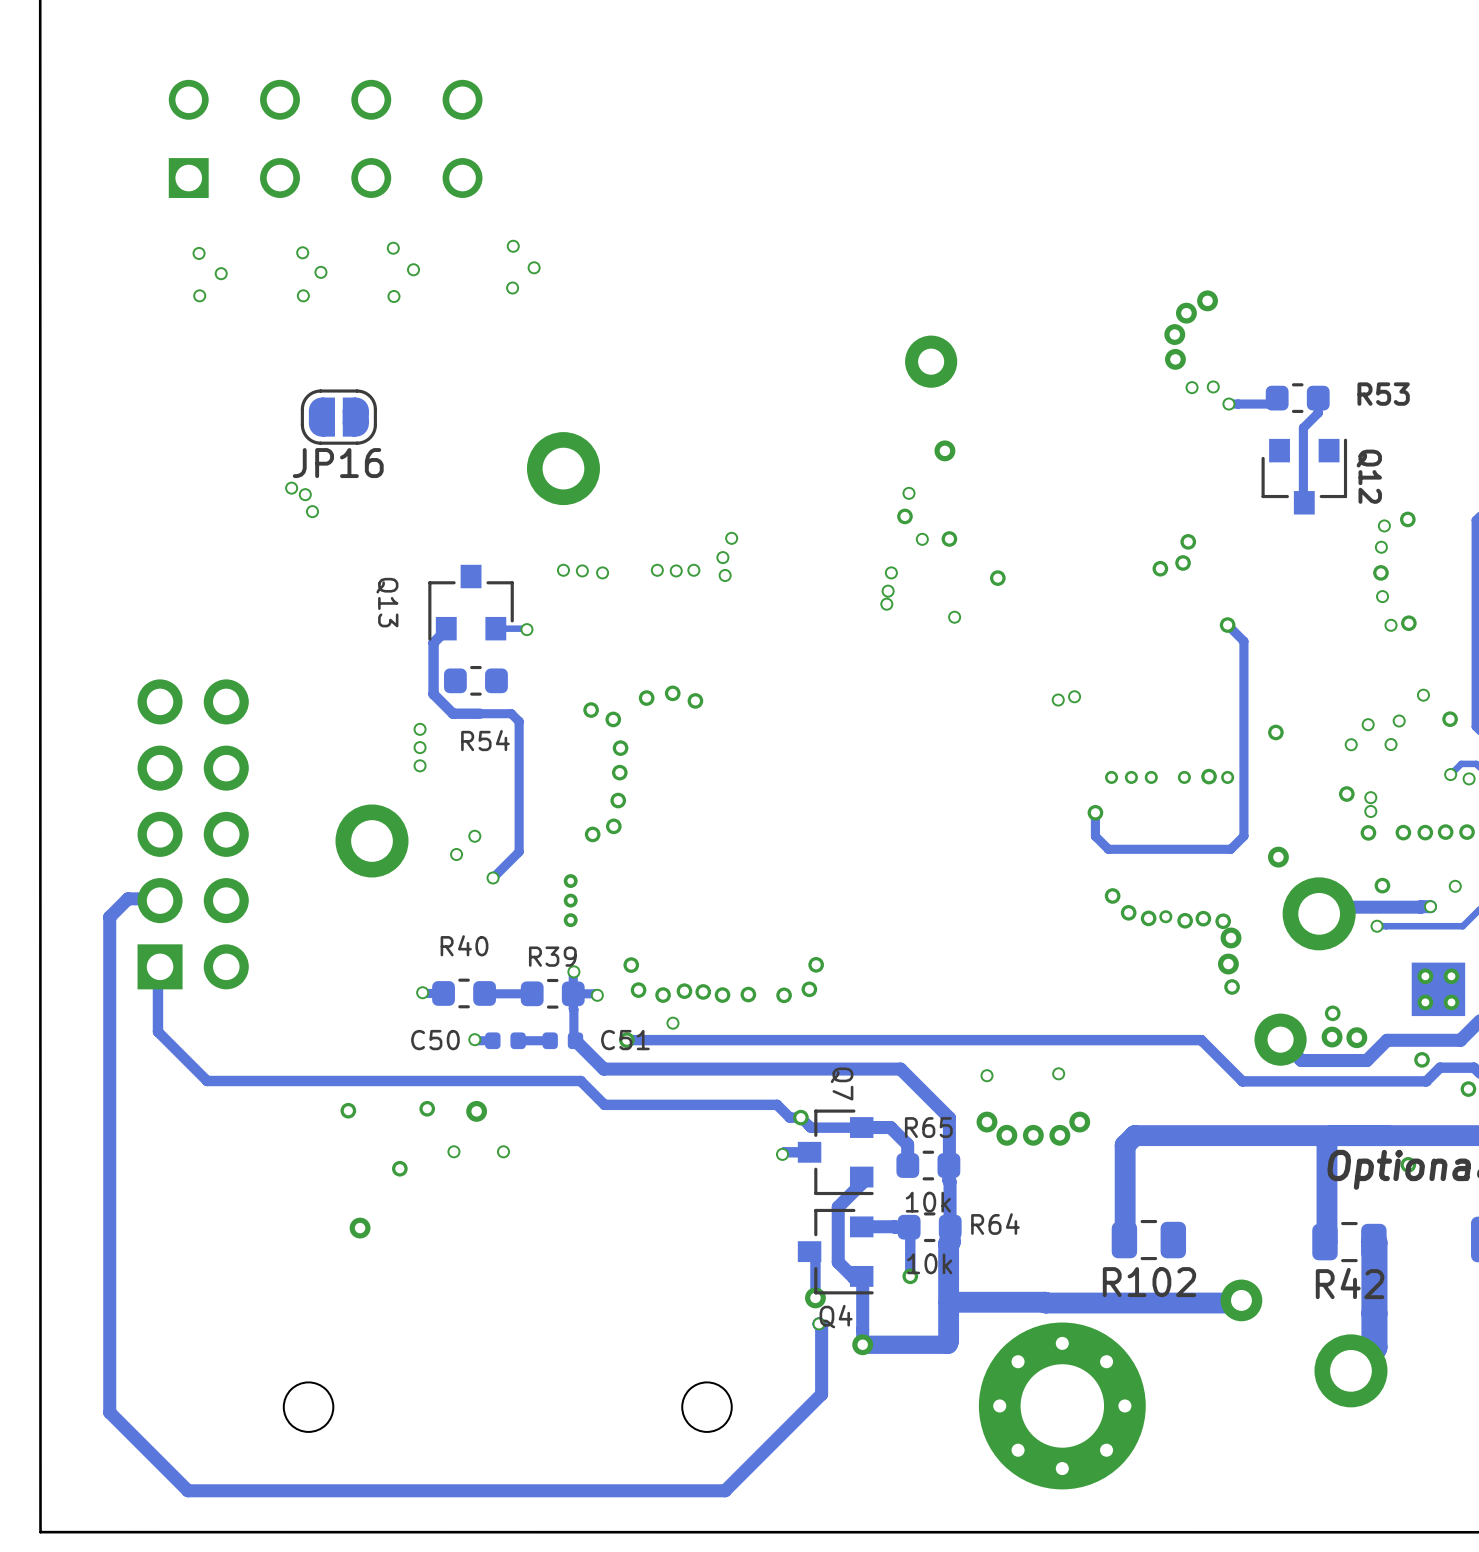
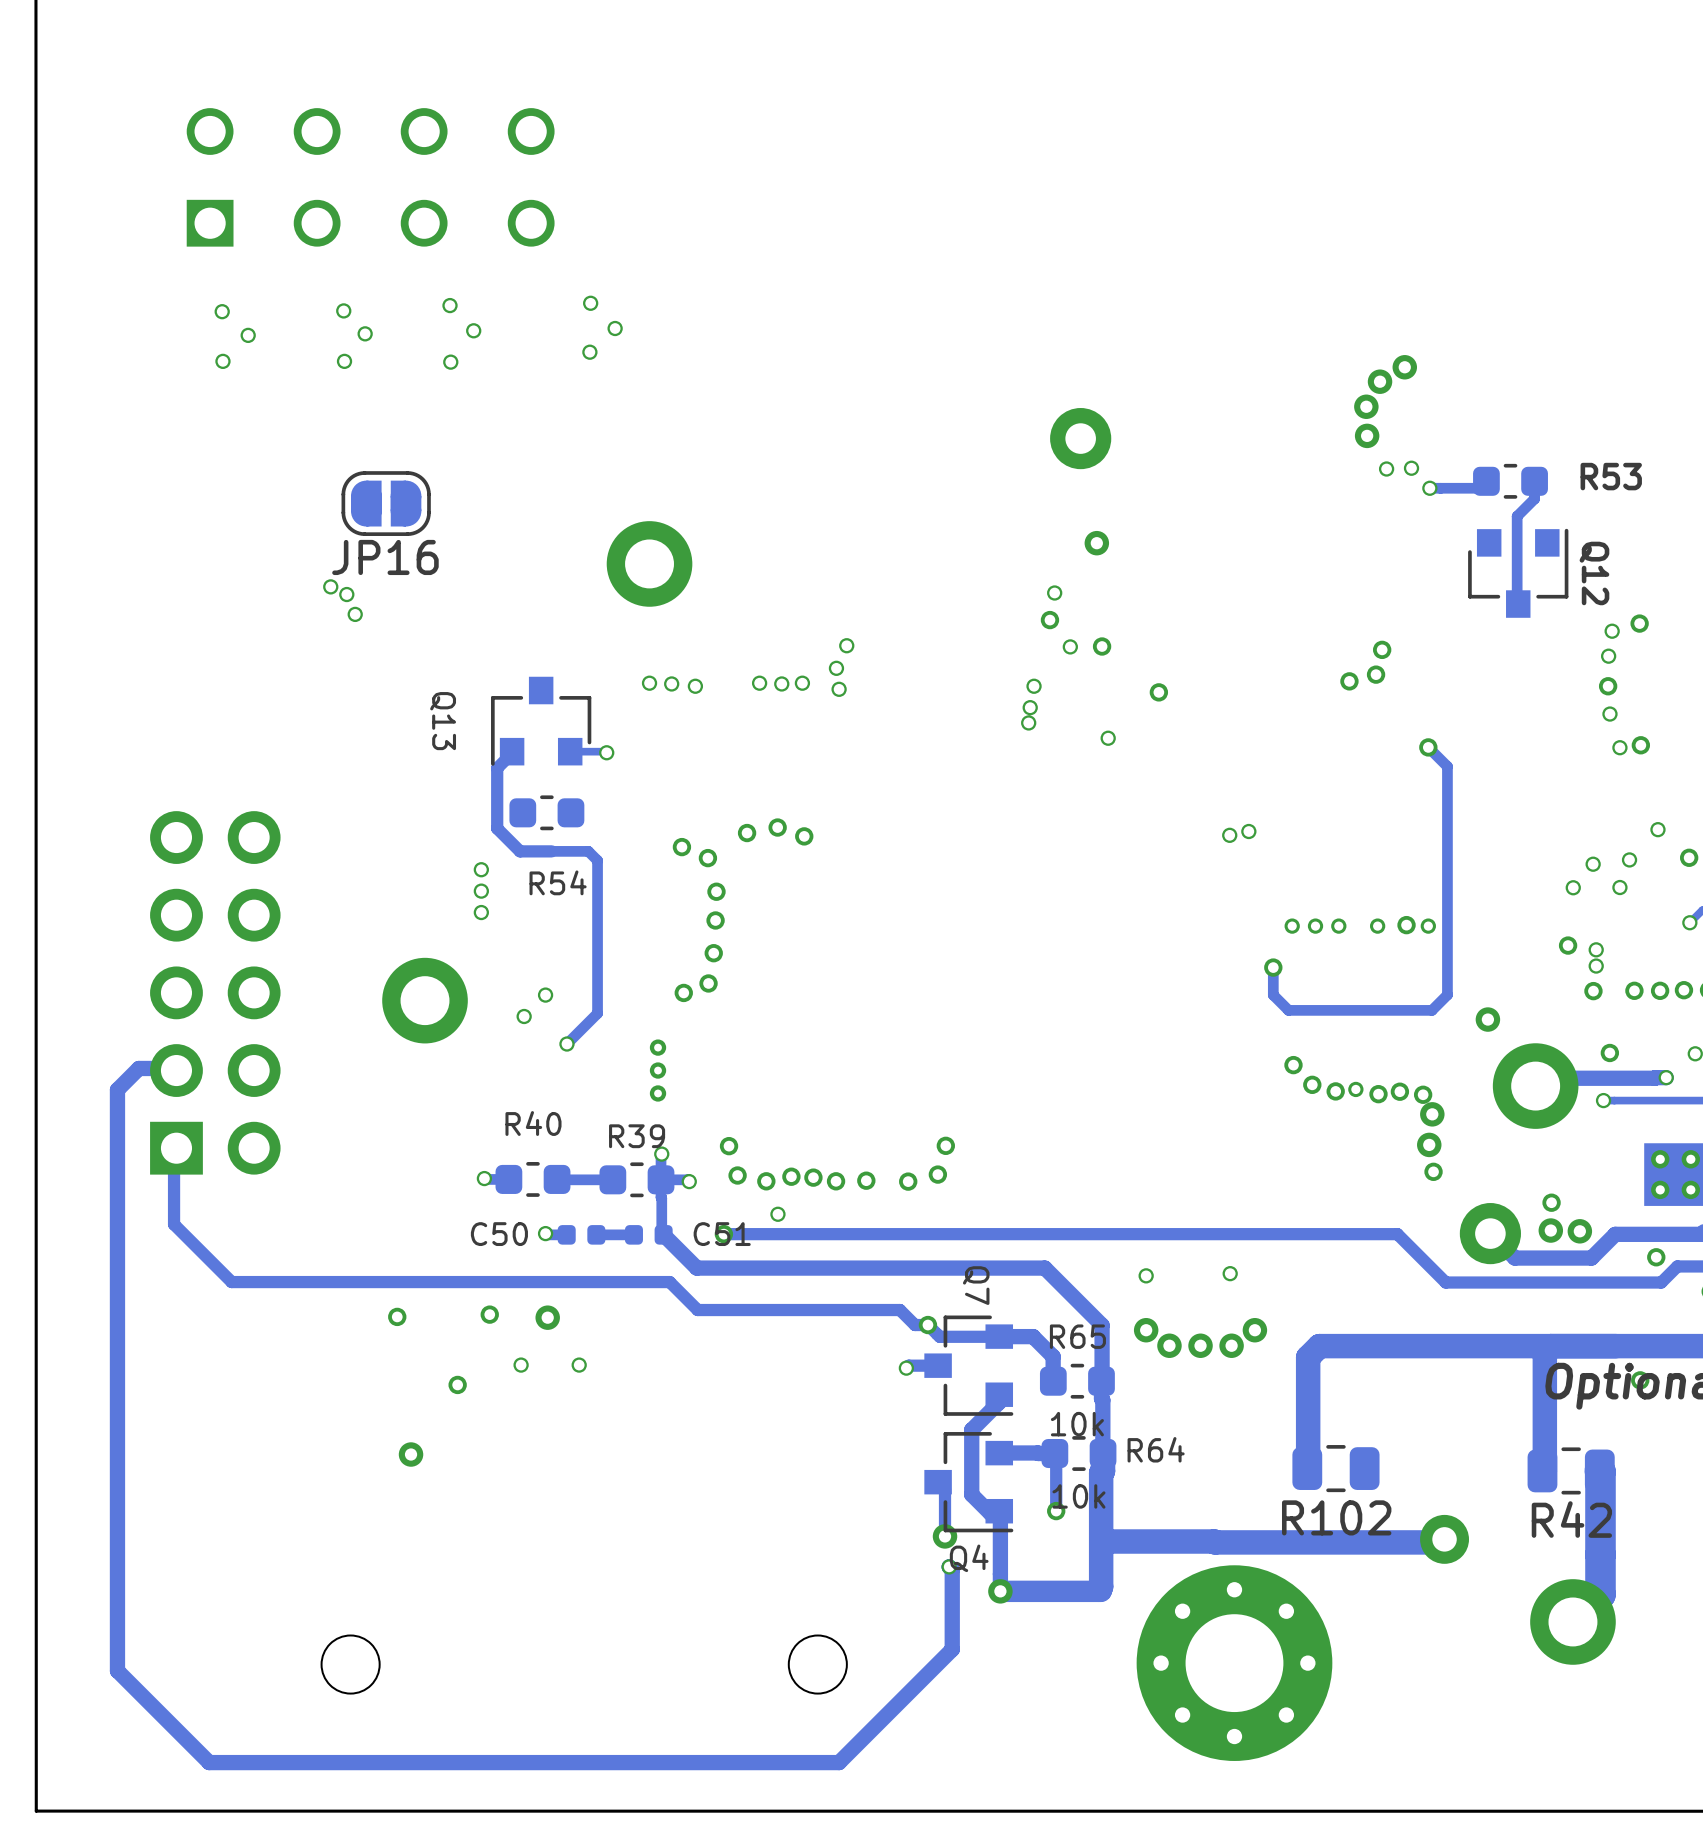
via: (1275, 732) -> none

